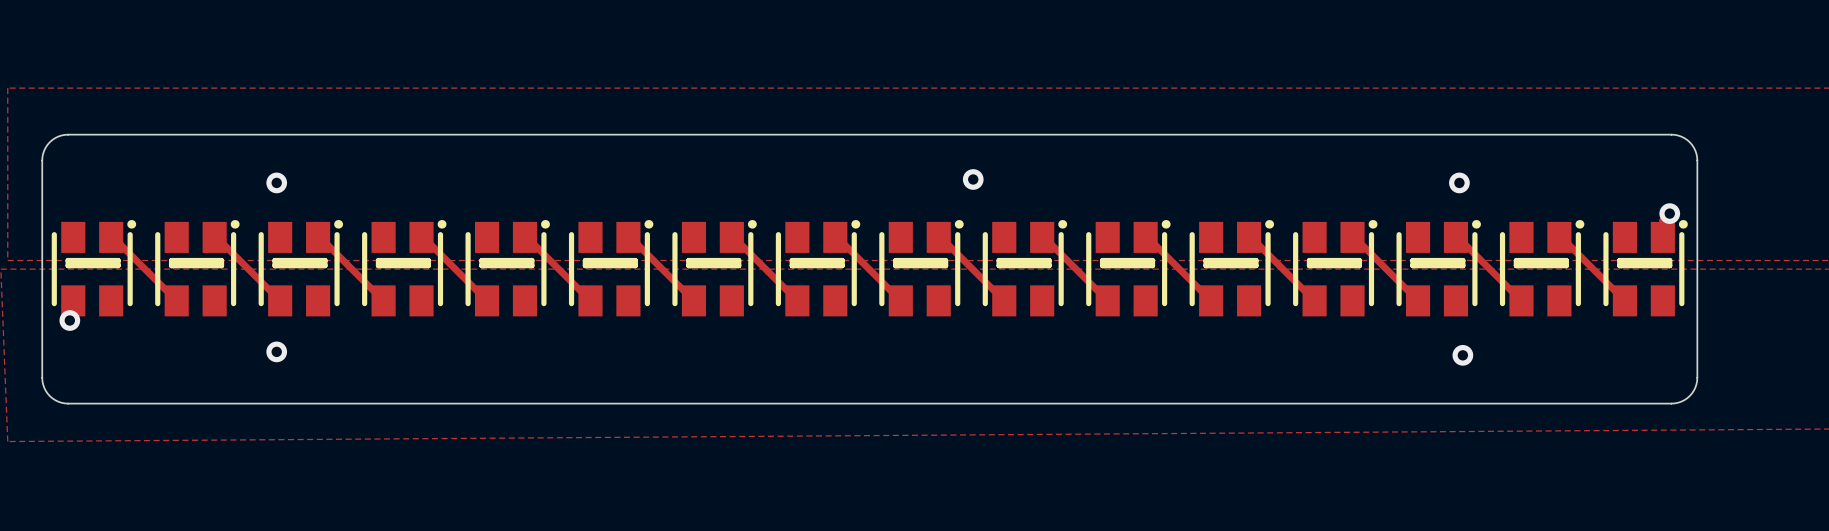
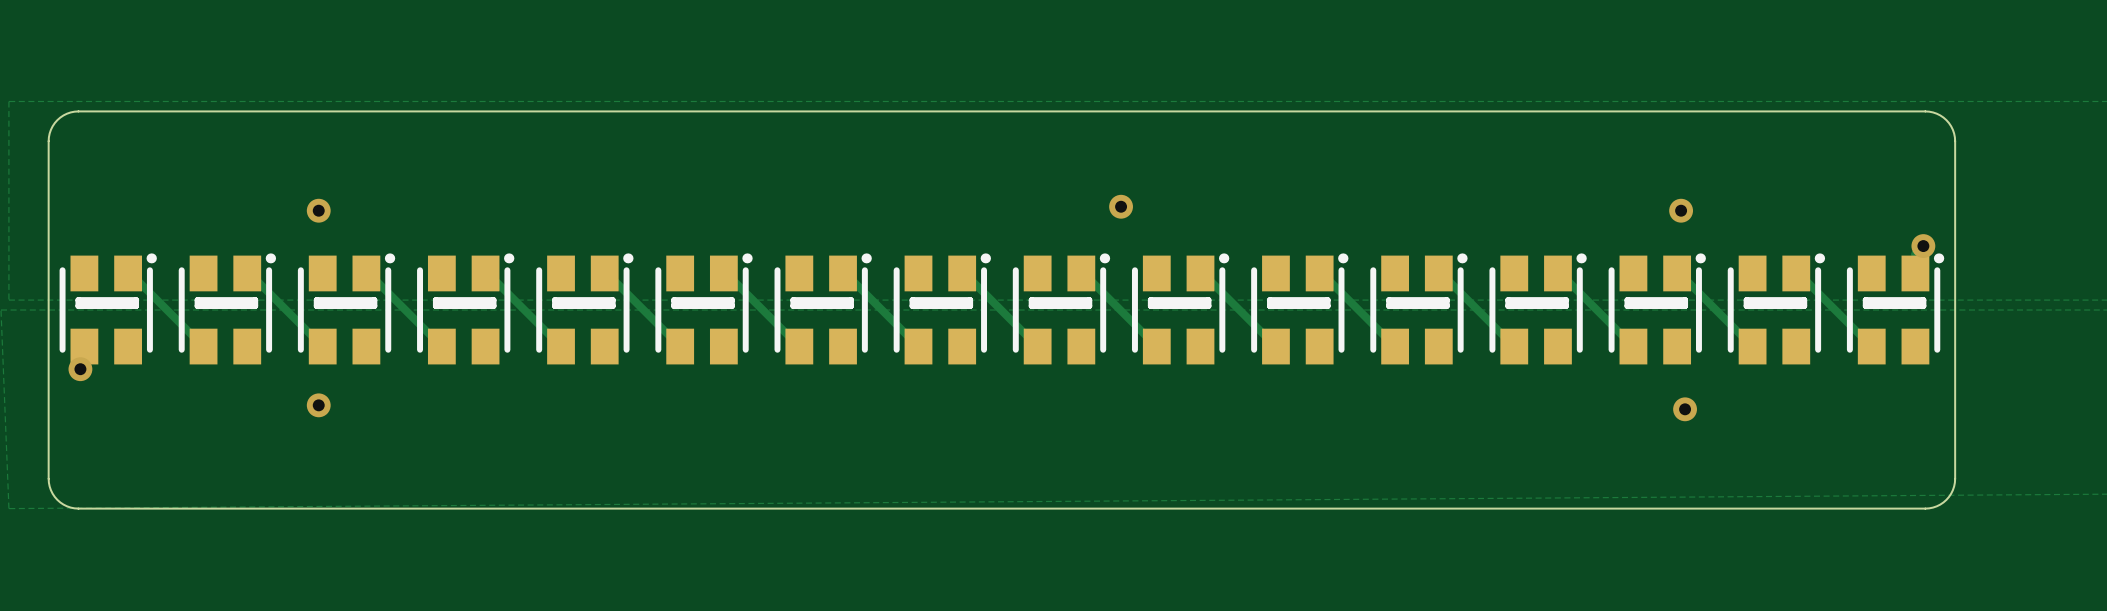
board edge: (42, 160) (44, 150) (49, 142) (58, 136) (68, 134) (1671, 134) (1681, 136) (1689, 142) (1695, 150) (1697, 160) -> (48, 184) (48, 141) (50, 129) (60, 117) (67, 113) (78, 111) (1925, 111) (1936, 113) (1943, 117) (1952, 129) (1955, 141) (1955, 184)
board edge: (42, 377) (44, 387) (49, 396) (58, 401) (68, 403) (1671, 403) (1681, 401) (1689, 396) (1695, 387) (1697, 377) -> (48, 435) (48, 478) (50, 490) (60, 502) (67, 506) (78, 508) (1925, 508) (1936, 506) (1943, 502) (1952, 490) (1955, 478) (1955, 435)

